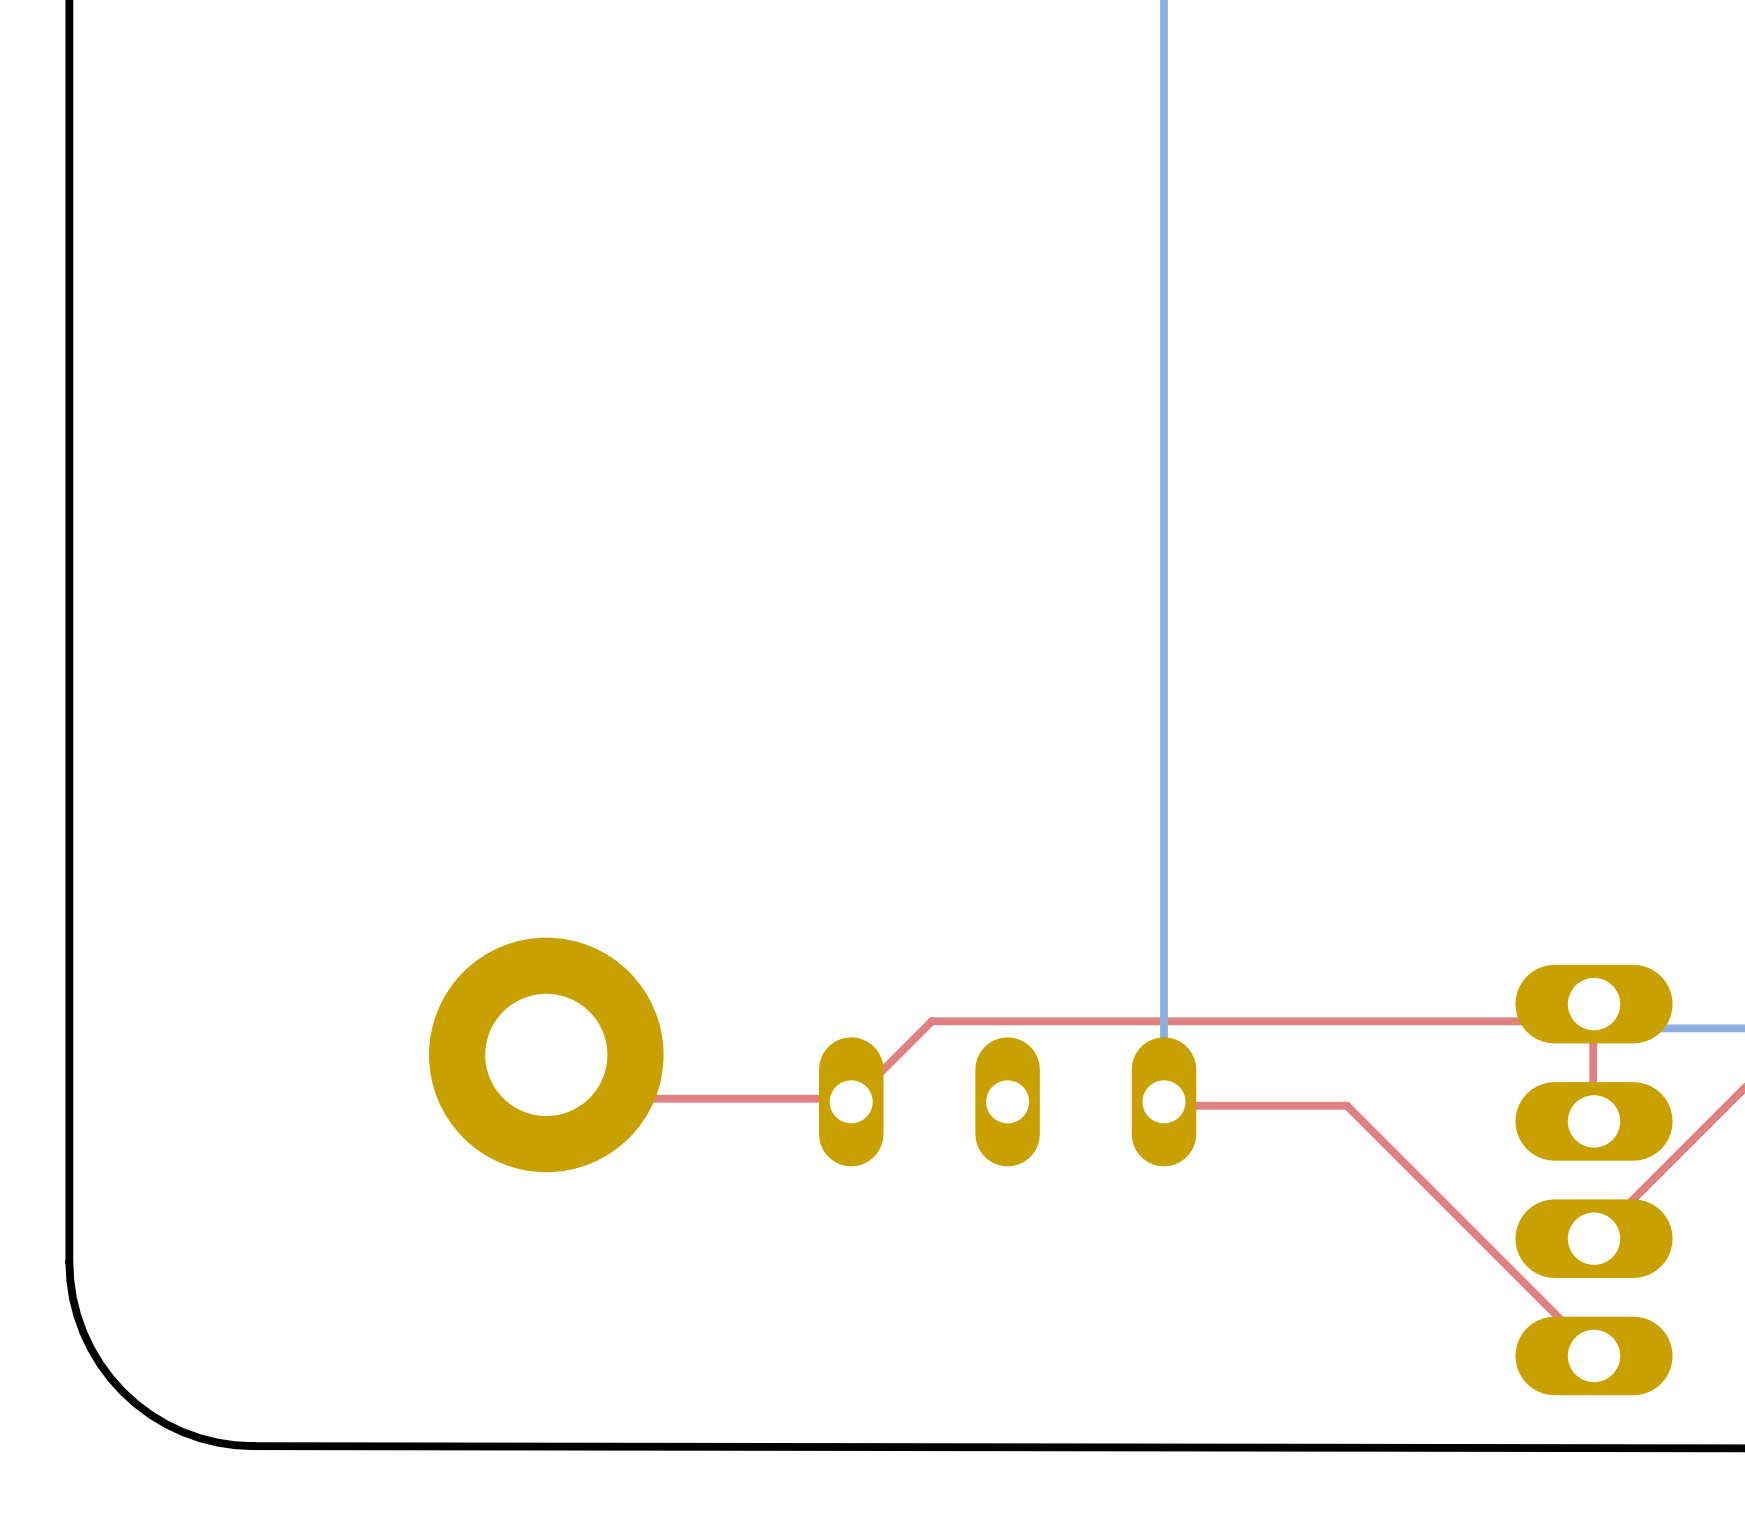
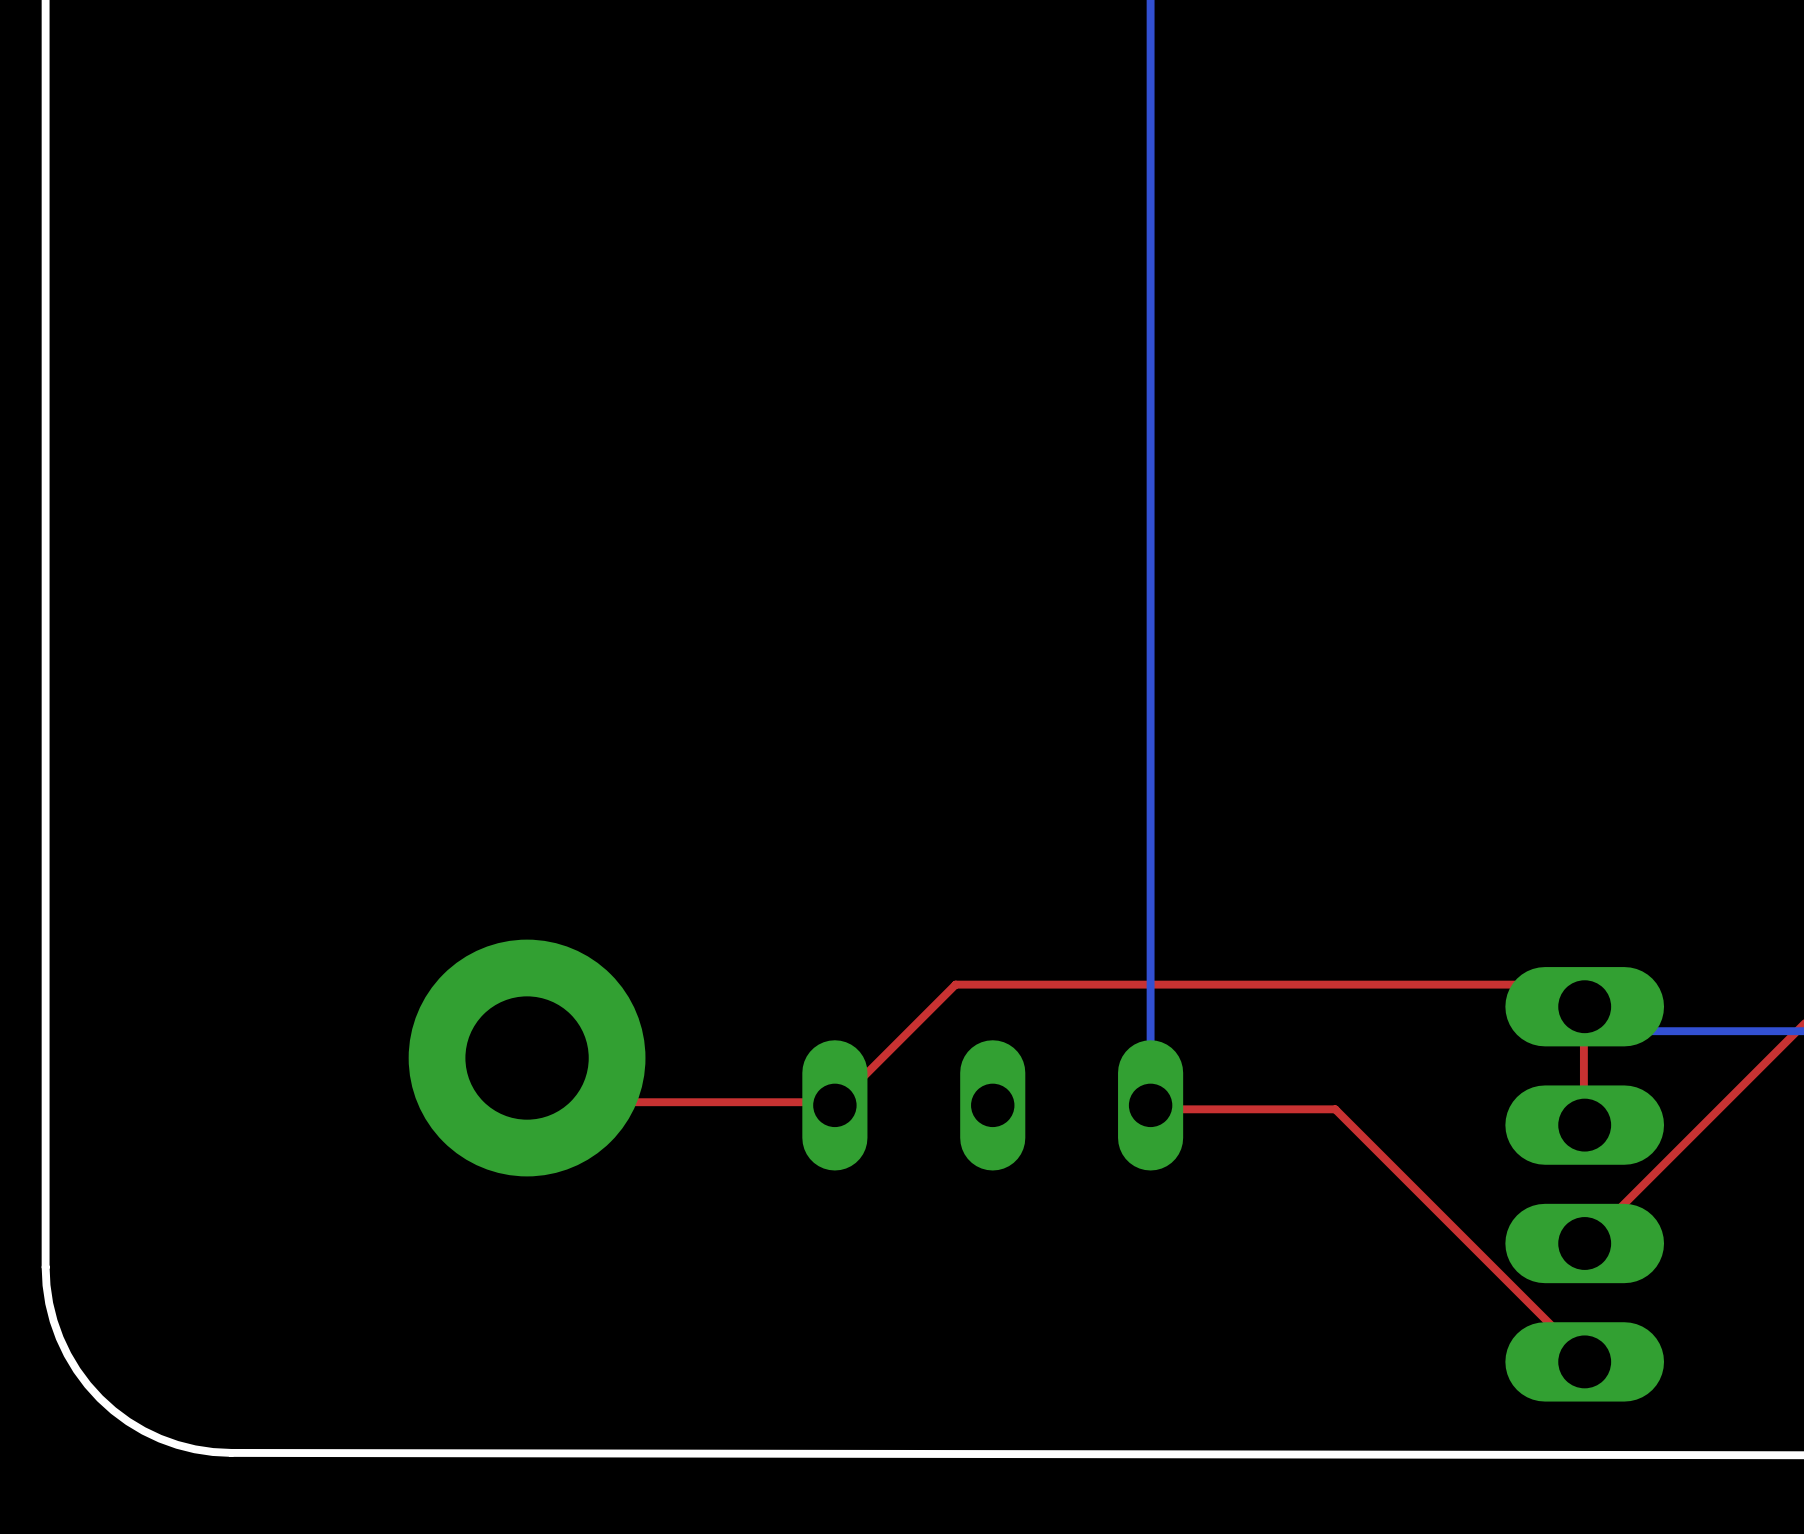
top track: (1593, 1021) (931, 1021) -> (1583, 1009) (1583, 984) (955, 984) (916, 1024)

